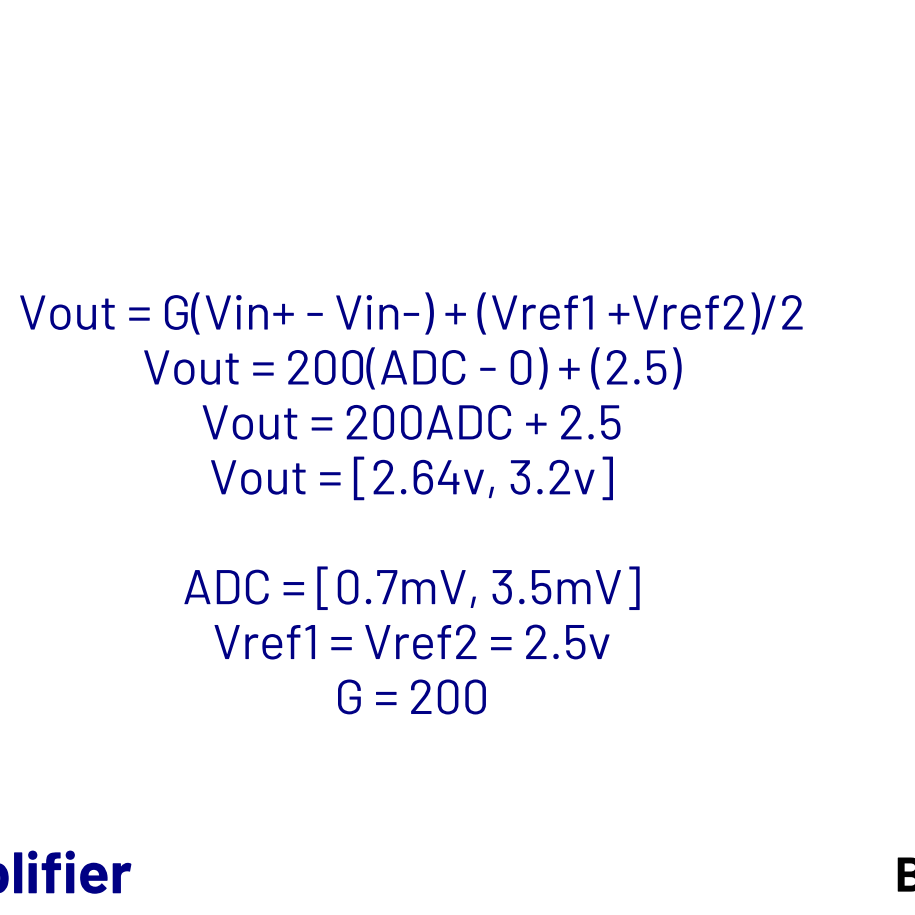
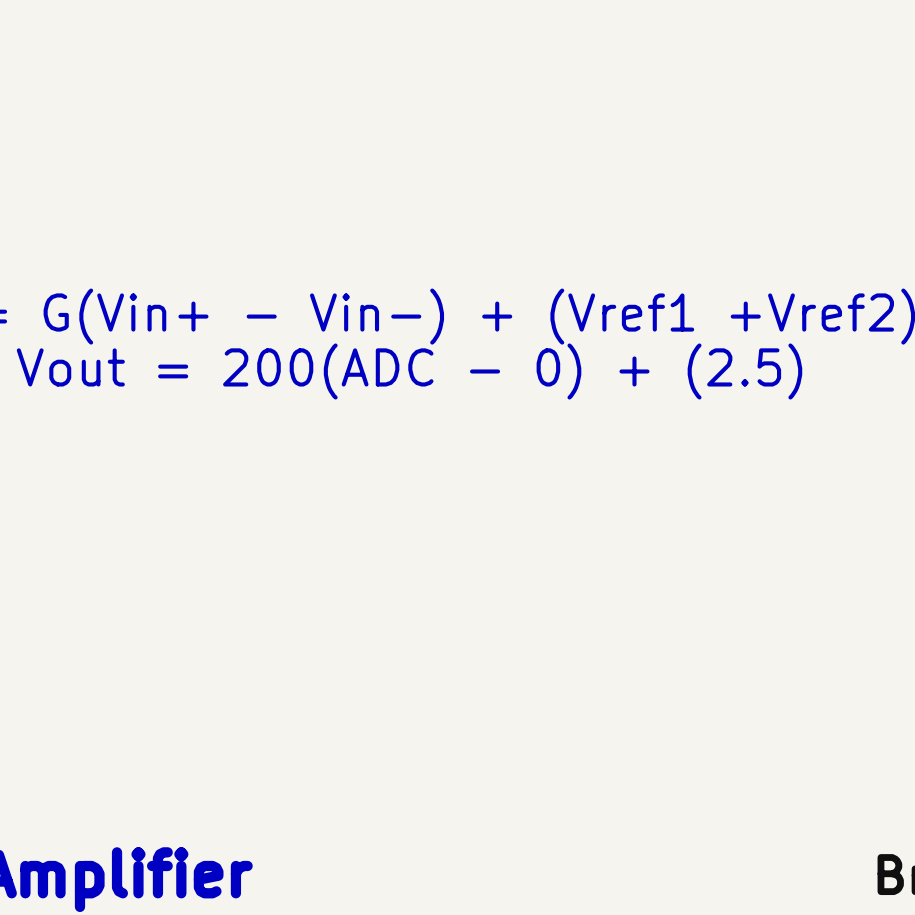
text: Vout = 200ADC + 2.5 (411, 422) -> none
text: Vout = [2.64v, 3.2v] (411, 478) -> none
text: ADC = [0.7mV, 3.5mV] (411, 588) -> none
text: Vref1 = Vref2 = 2.5v (412, 642) -> none
text: G = 200 (411, 696) -> none

